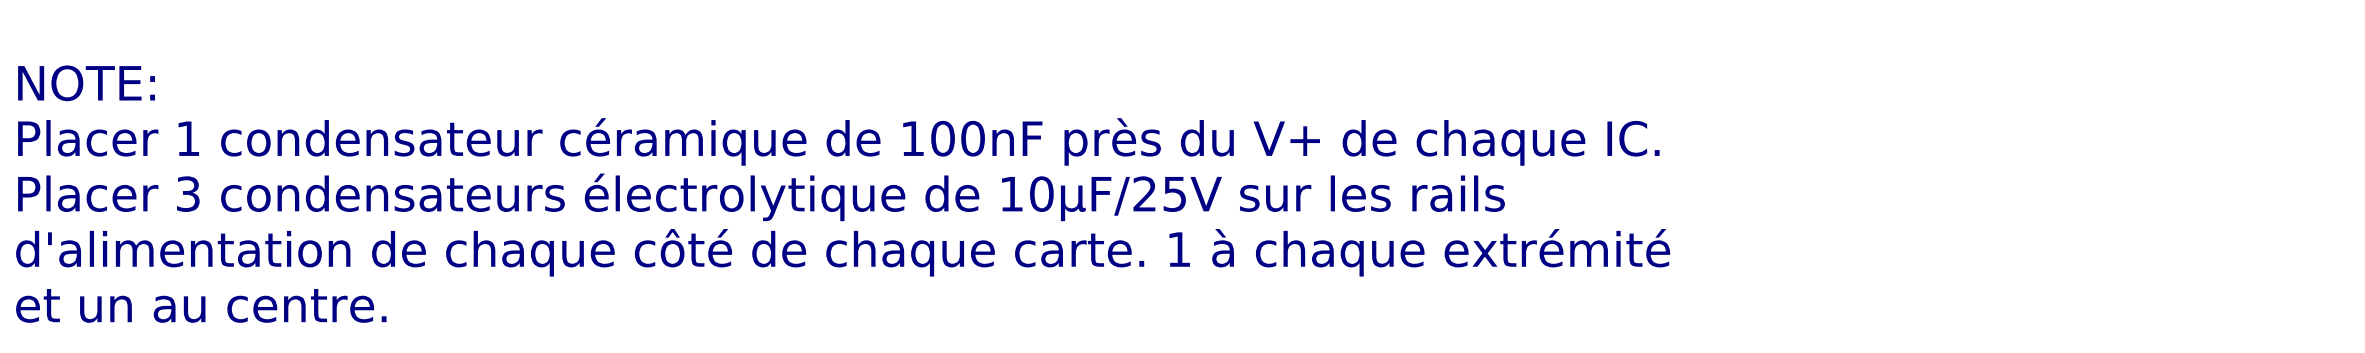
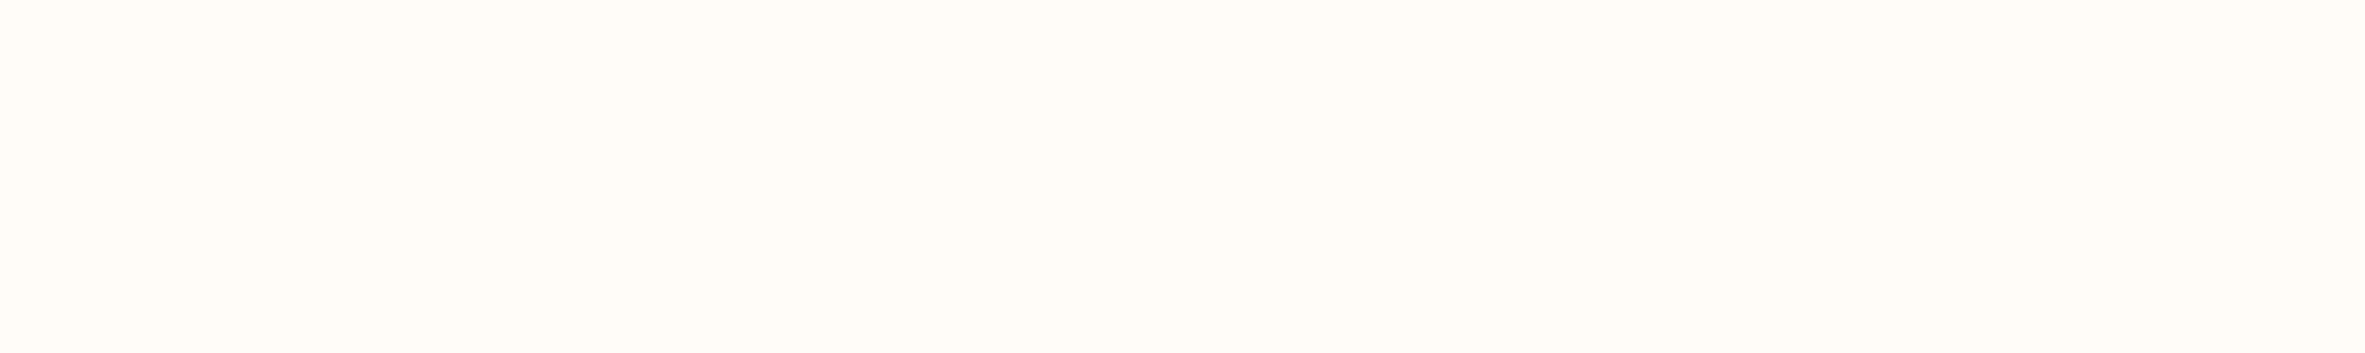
text: NOTE: (86, 83) -> none
text: Placer 1 condensateur céramique de 100nF près du V+ de chaque IC. (838, 141) -> none
text: Placer 3 condensateurs électrolytique de 10µF/25V sur les rails (761, 197) -> none
text: d'alimentation de chaque côté de chaque carte. 1 à chaque extrémité (843, 252) -> none
text: et un au centre. (201, 305) -> none

